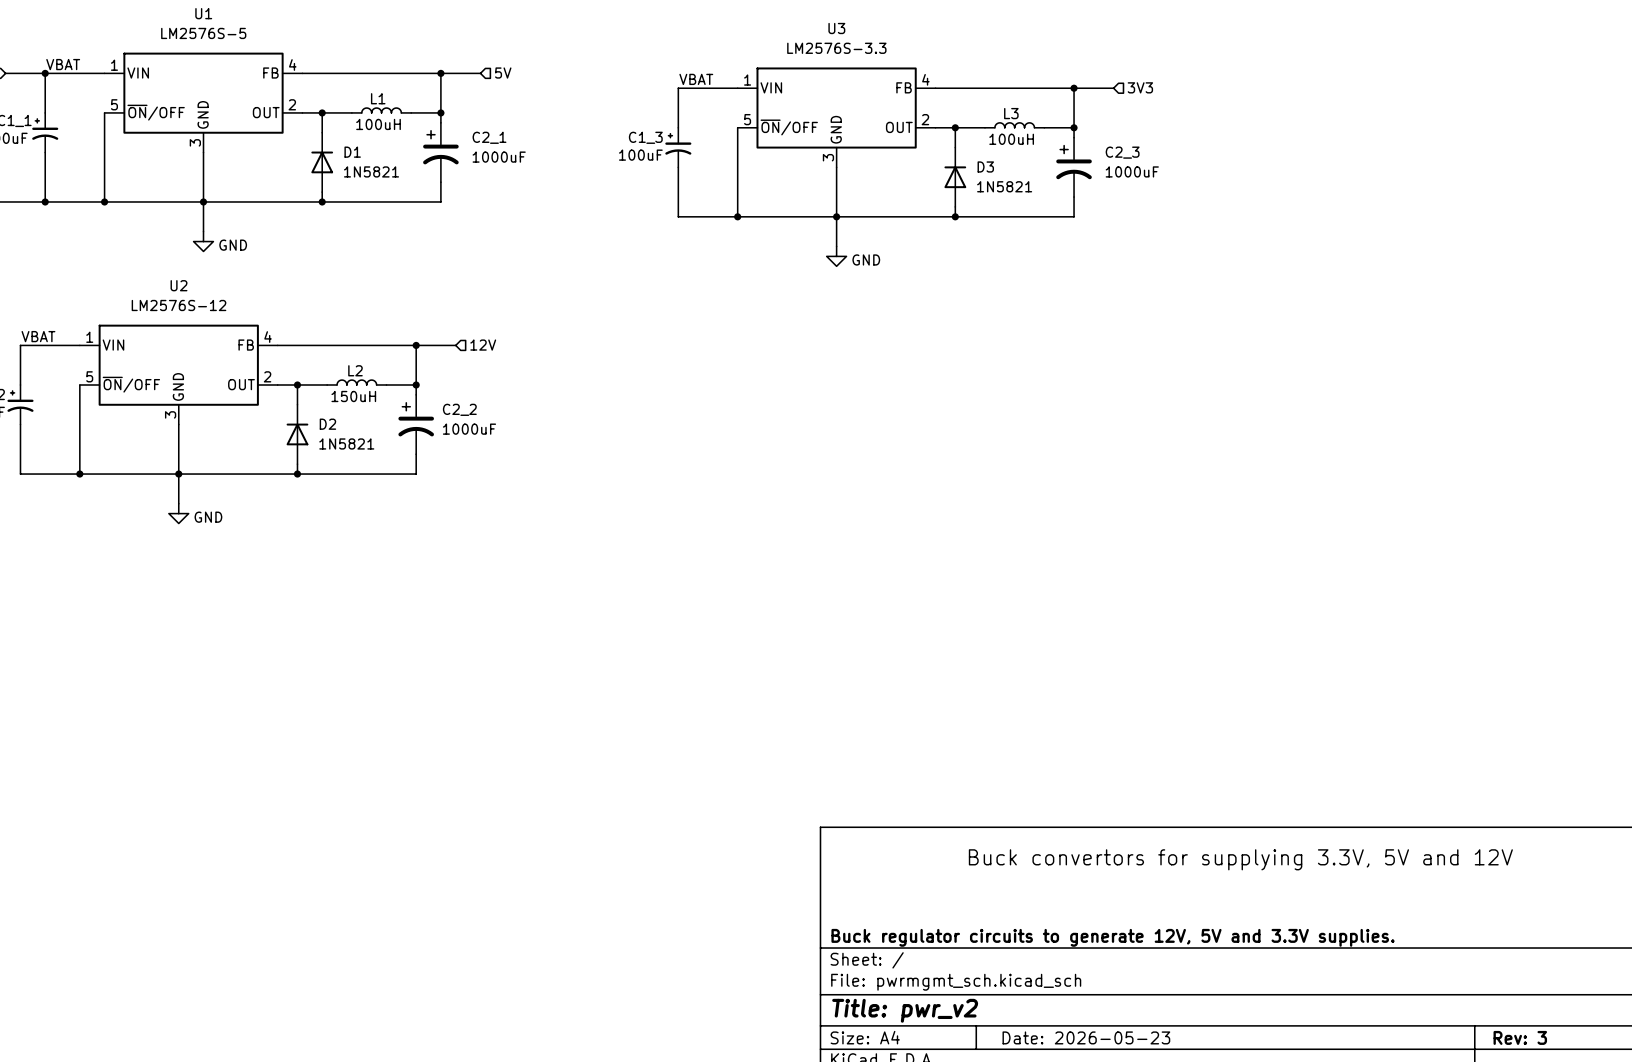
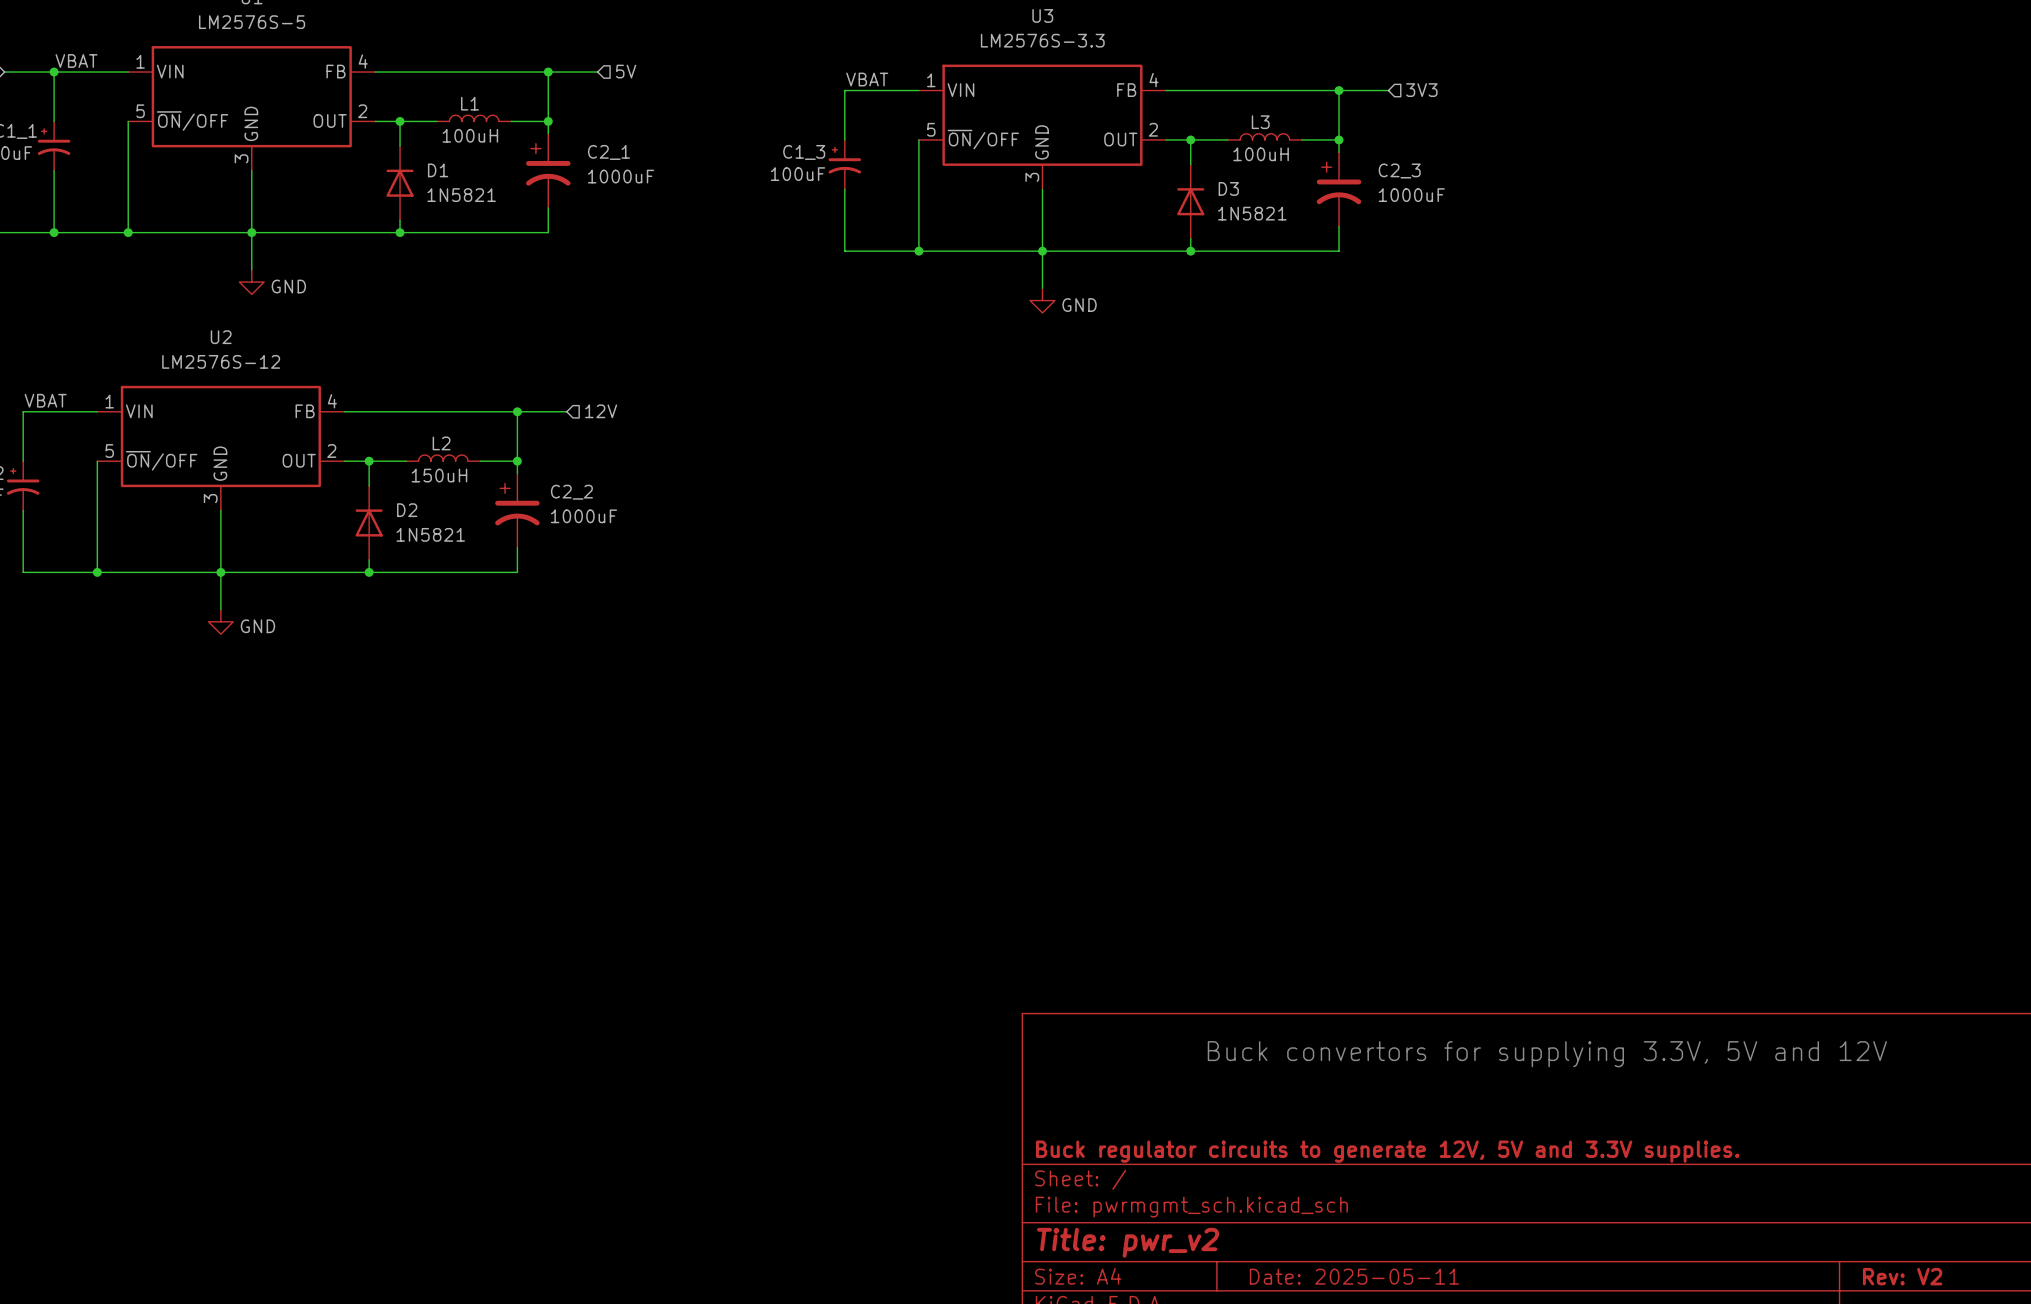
title block: Date: 2026-05-23 (1086, 1037) -> Date: 2025-05-11 (1354, 1276)
title block: Rev: 3 (1520, 1037) -> Rev: V2 (1902, 1276)

